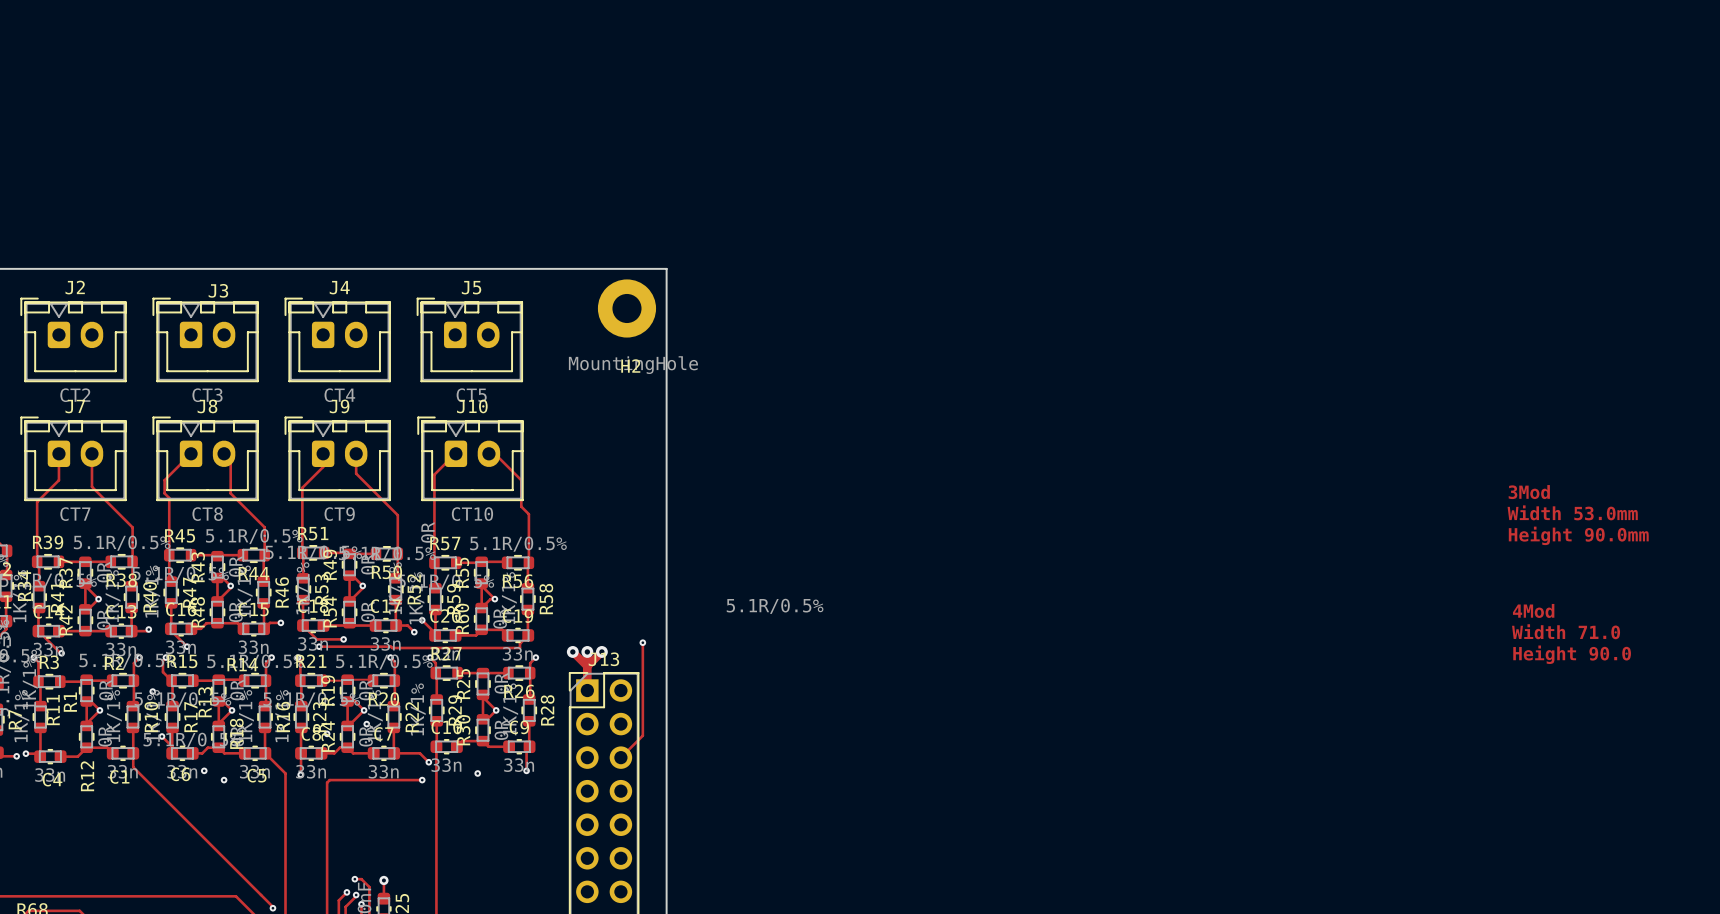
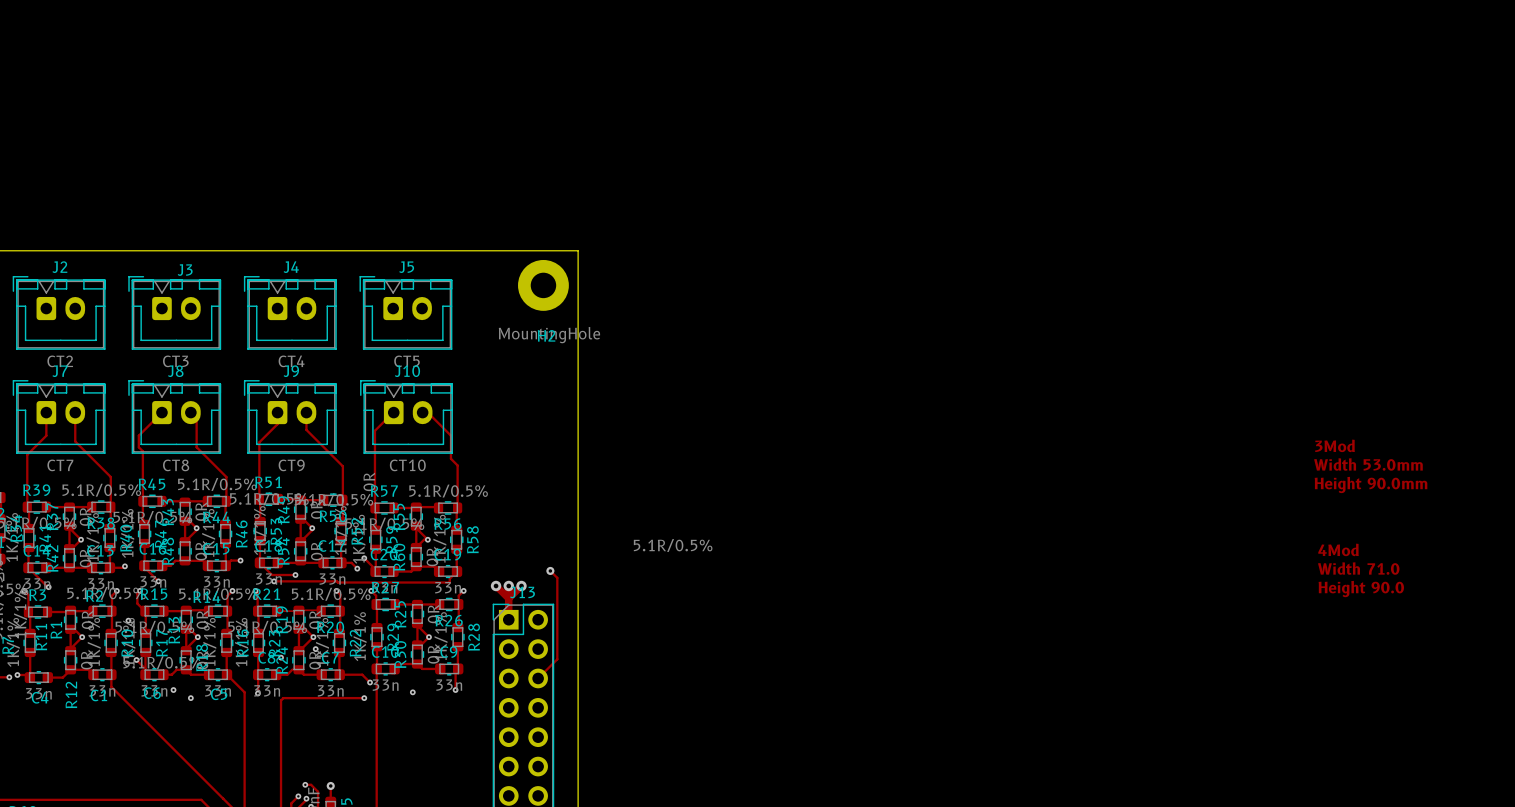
track: none -> (550, 570) (557, 577)
via: none -> (550, 570)
via: (642, 642) -> none

